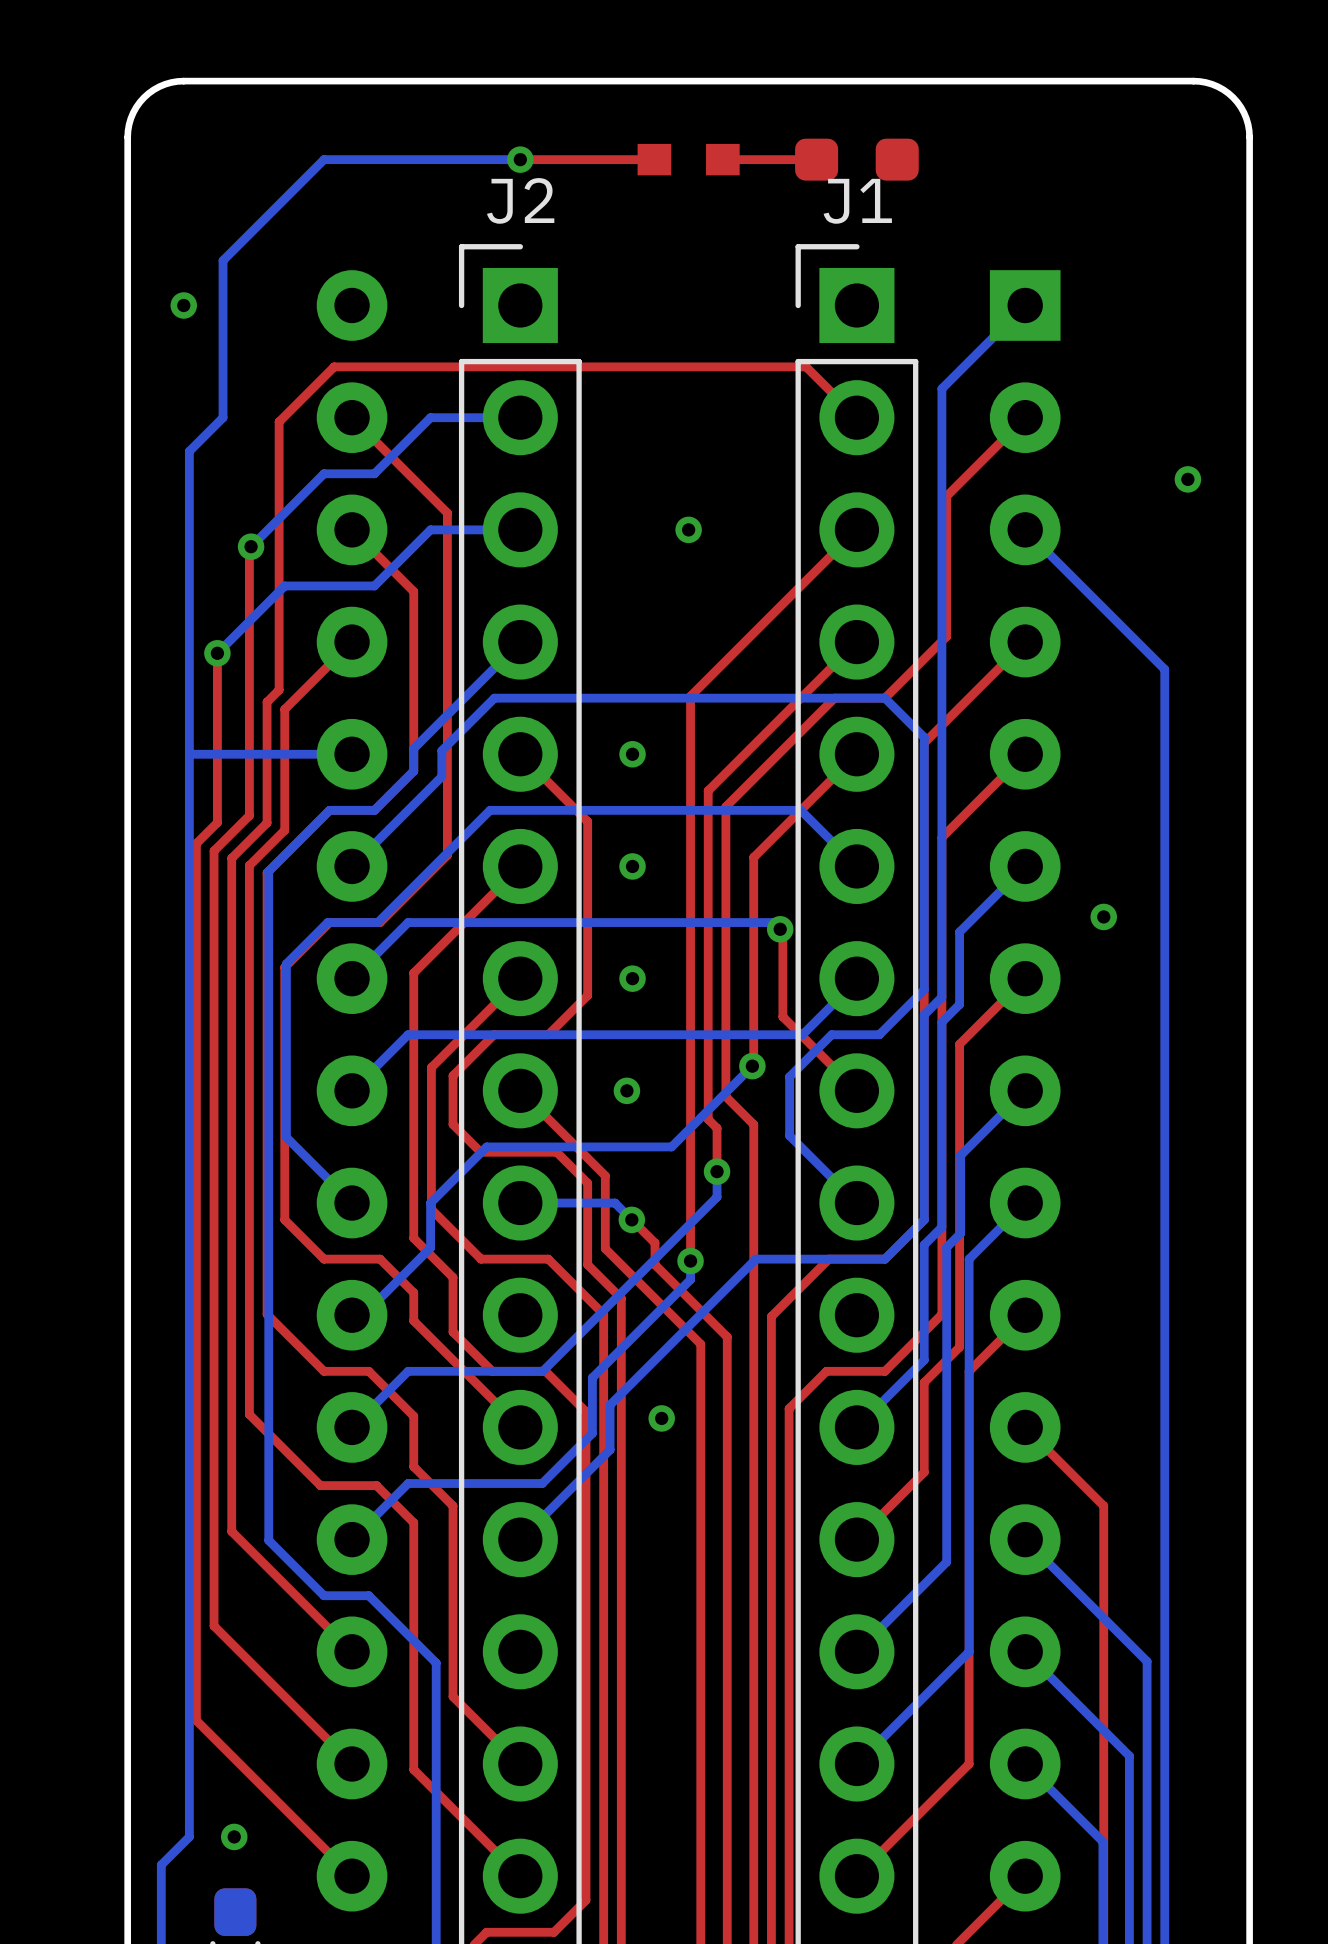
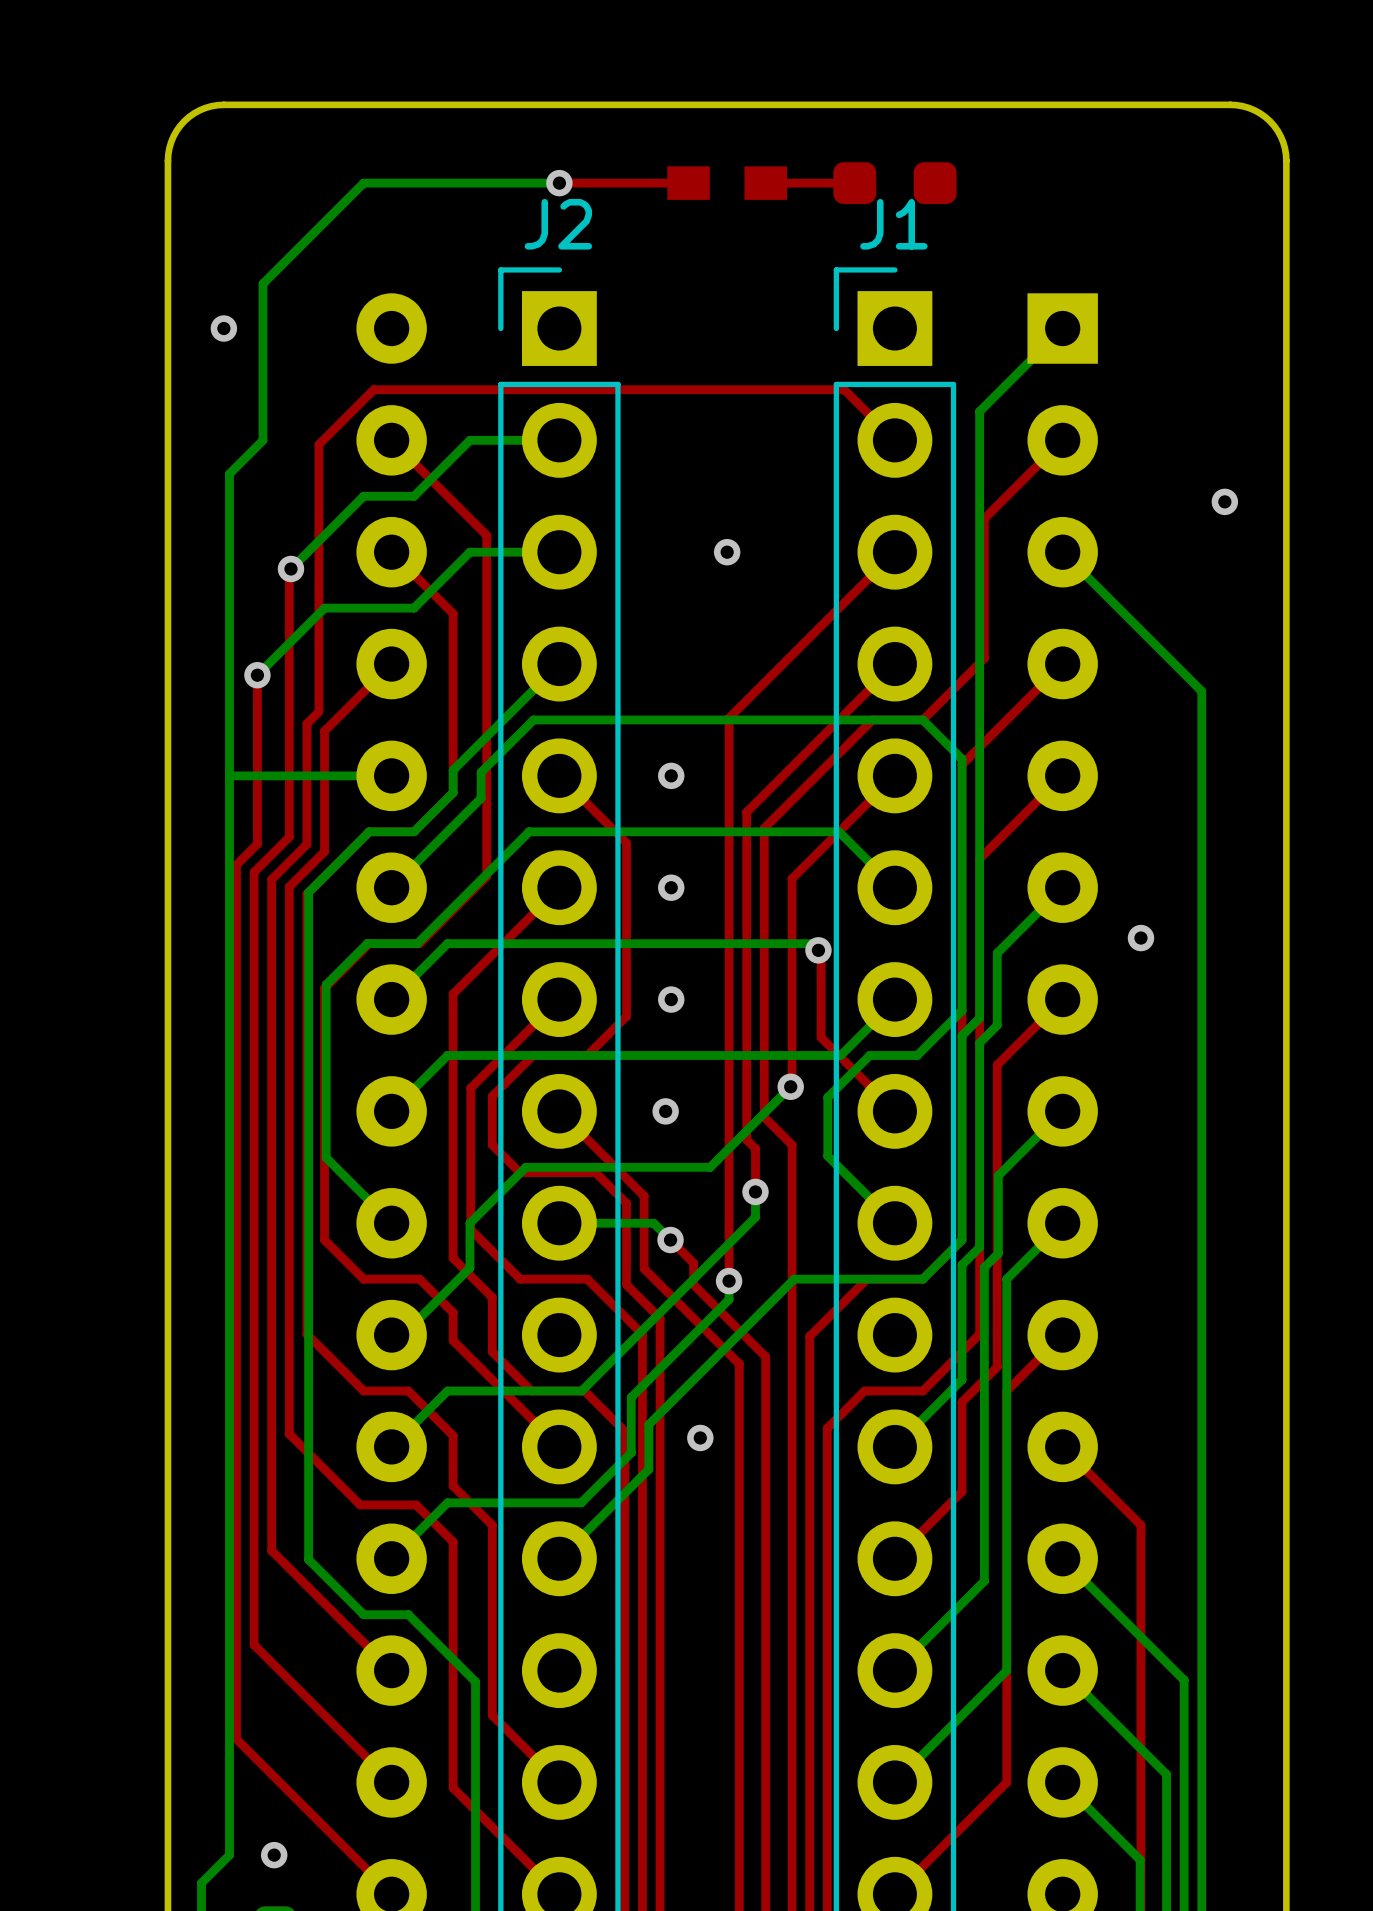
part footprint: [637, 143, 740, 176] -> [667, 166, 788, 200]

